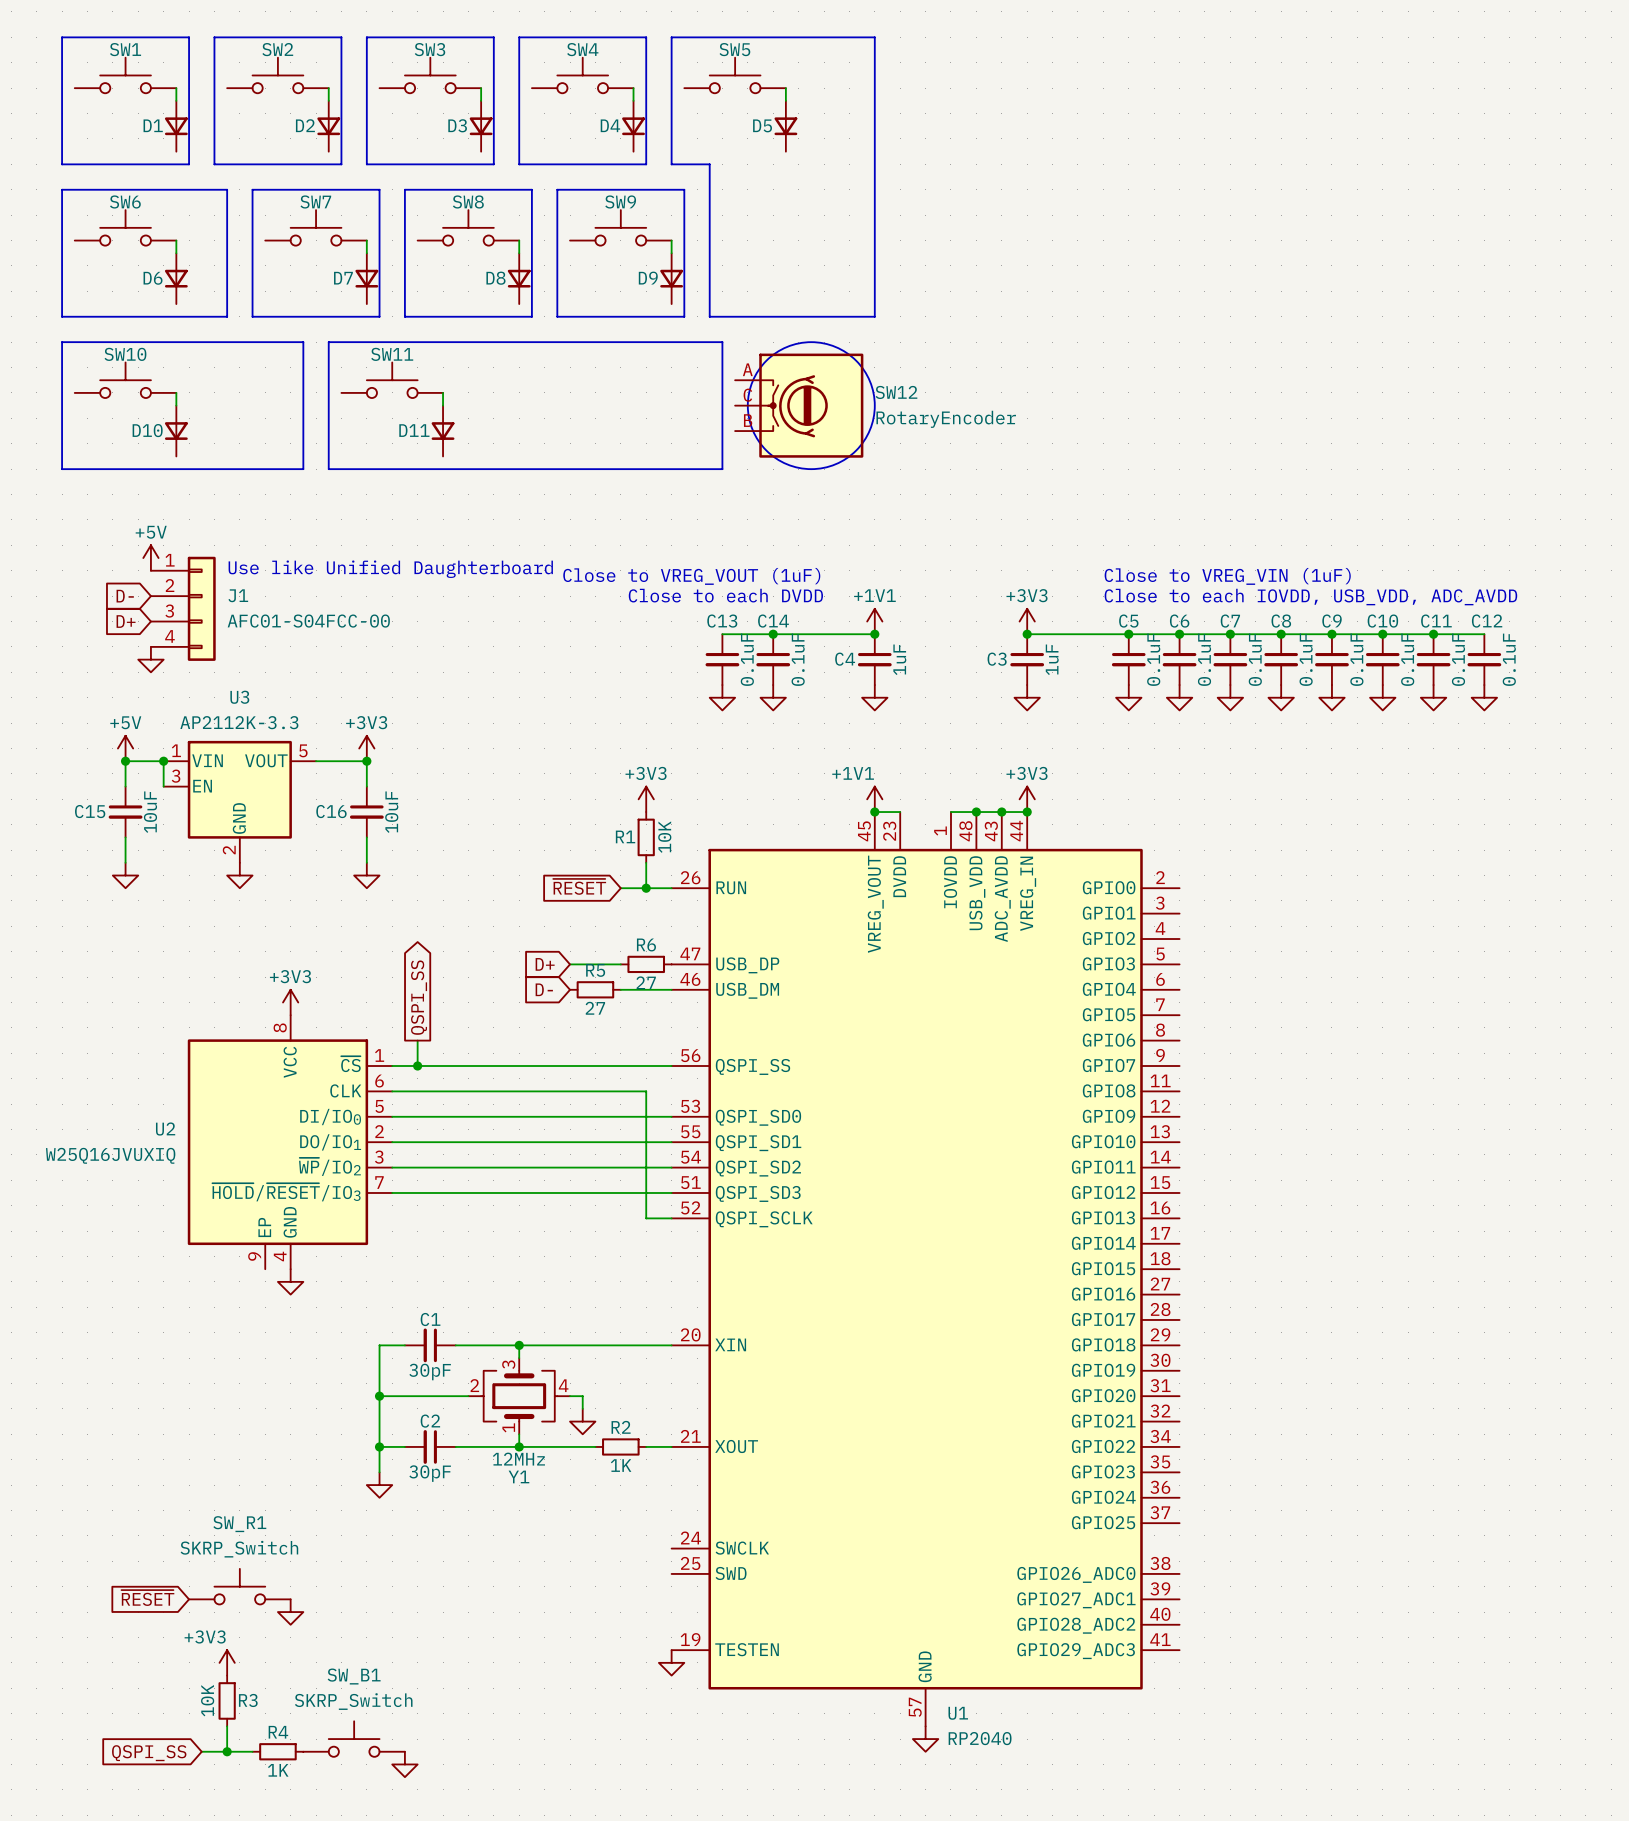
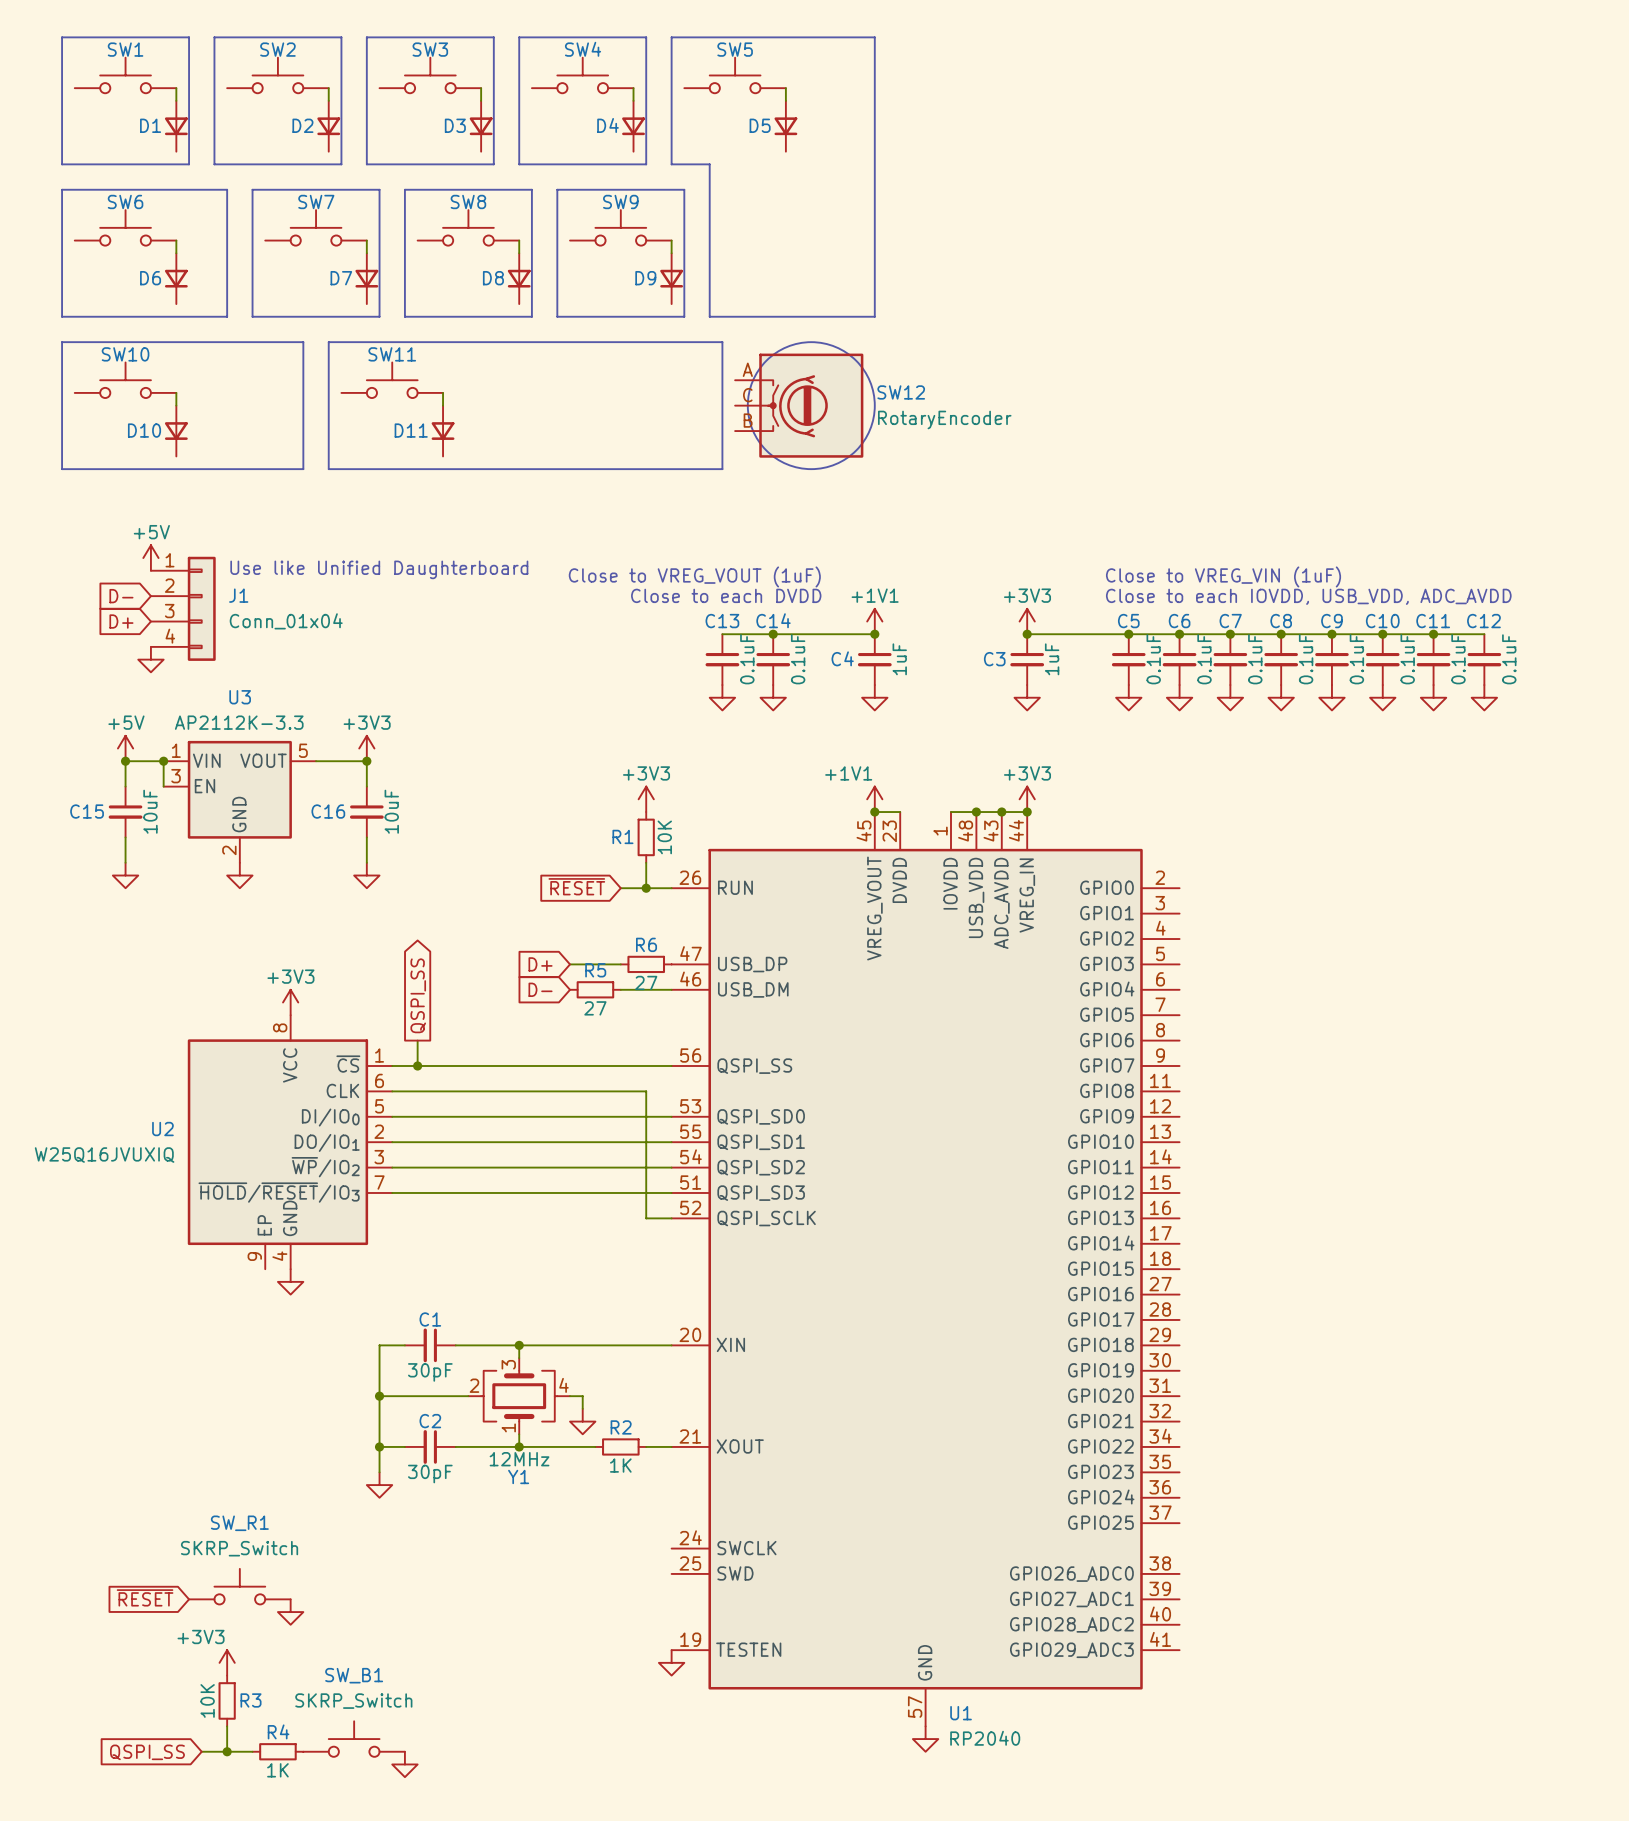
J1 value: AFC01-S04FCC-00 (308, 621) -> Conn_01x04 (286, 621)

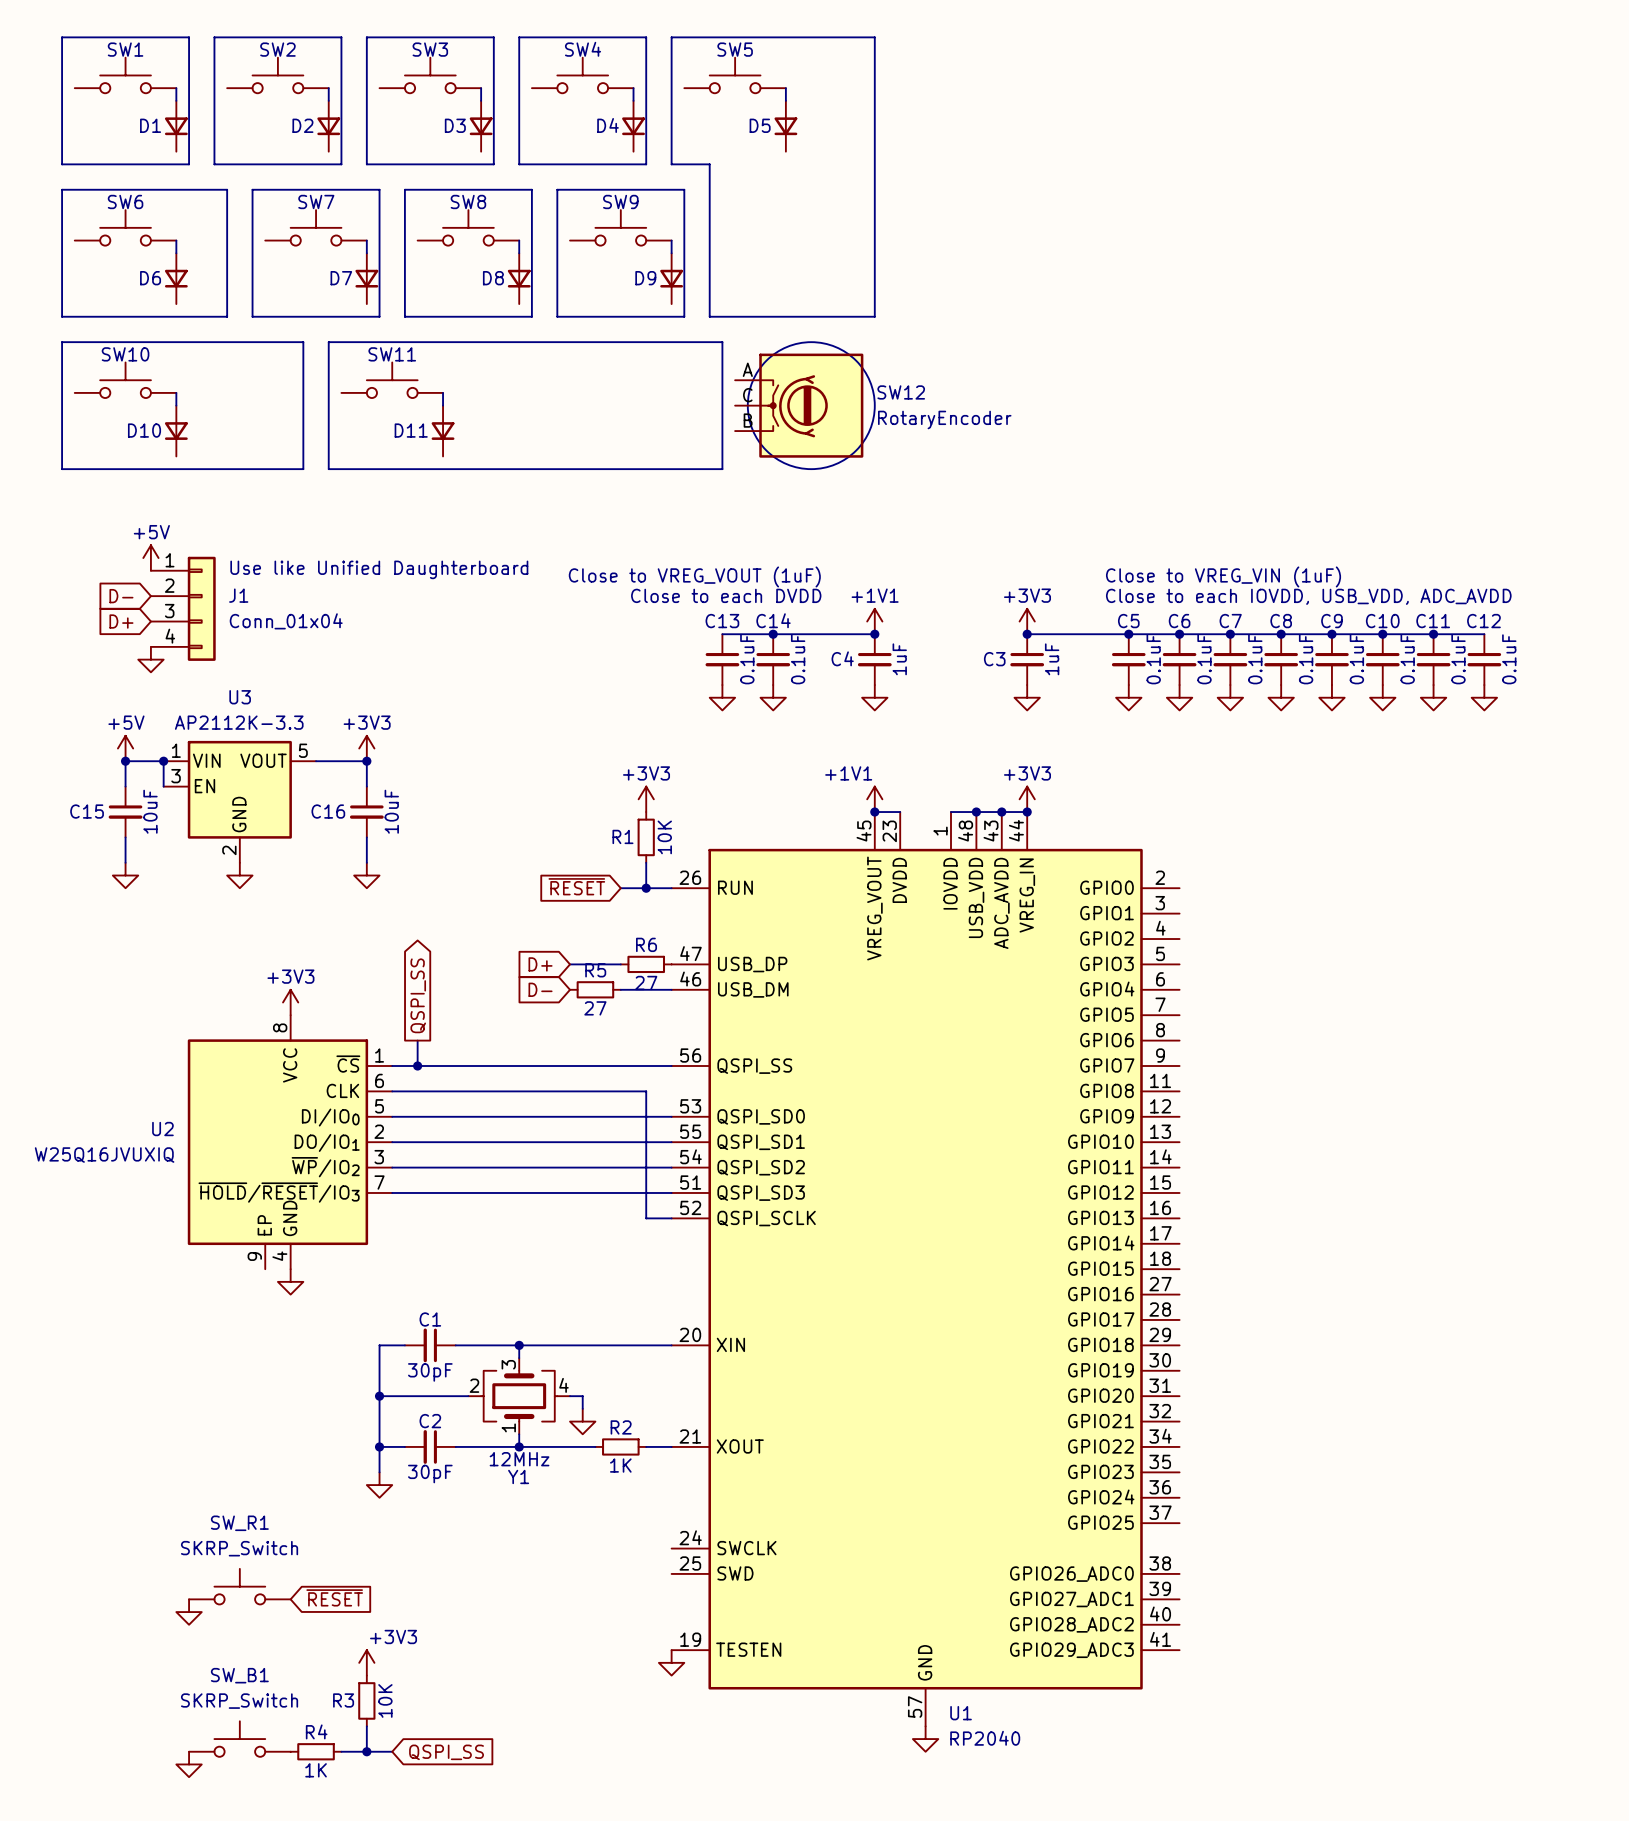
global label rotation: 0° (145, 1597) -> 180° (334, 1597)
global label position: ~{RESET} (145, 1597) -> ~{RESET} (334, 1597)
power symbol: none -> (189, 1612)
power symbol: (290, 1612) -> none
power symbol text position: +3V3 (201, 1636) -> +3V3 (393, 1636)
power symbol position: +3V3 (227, 1662) -> +3V3 (366, 1662)
R3 value position: 10K (207, 1700) -> 10K (385, 1700)
R3 position: (227, 1700) -> (366, 1700)
R3 name position: R3 (251, 1700) -> R3 (343, 1700)
wire: (227, 1726) (227, 1751) -> (366, 1726) (366, 1751)
SW_B1 position: (354, 1739) -> (239, 1739)
wire: (201, 1751) (252, 1751) -> (341, 1751) (392, 1751)
junction: (227, 1751) -> none
R4 position: (277, 1751) -> (316, 1751)
junction: none -> (366, 1751)
global label rotation: 0° (147, 1752) -> 180° (446, 1752)
global label position: QSPI_SS (147, 1752) -> QSPI_SS (446, 1752)
power symbol: none -> (189, 1764)
power symbol: (404, 1764) -> none

